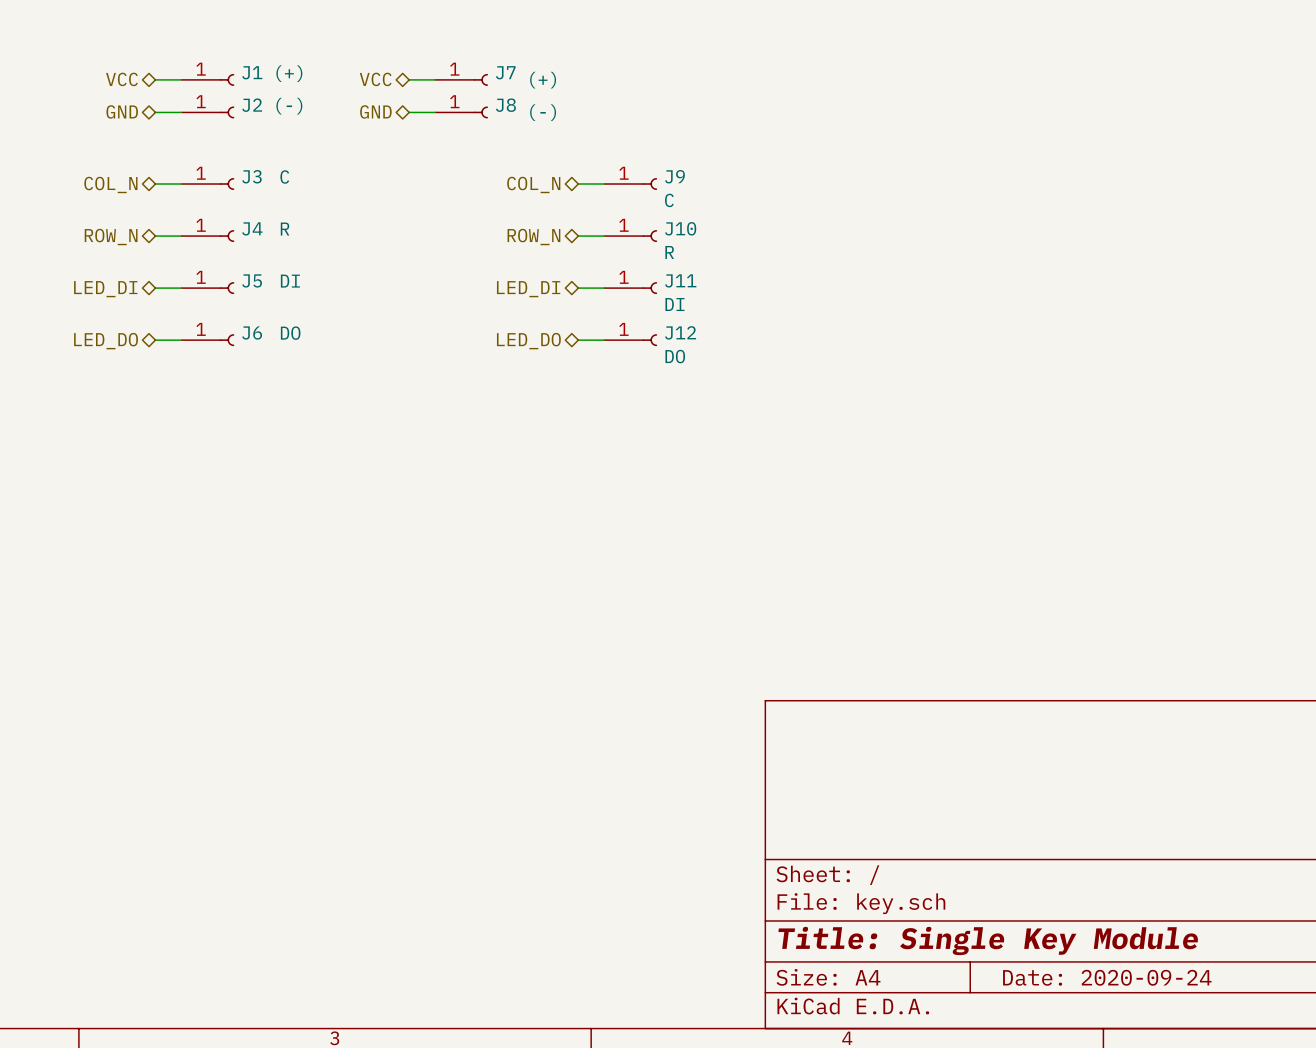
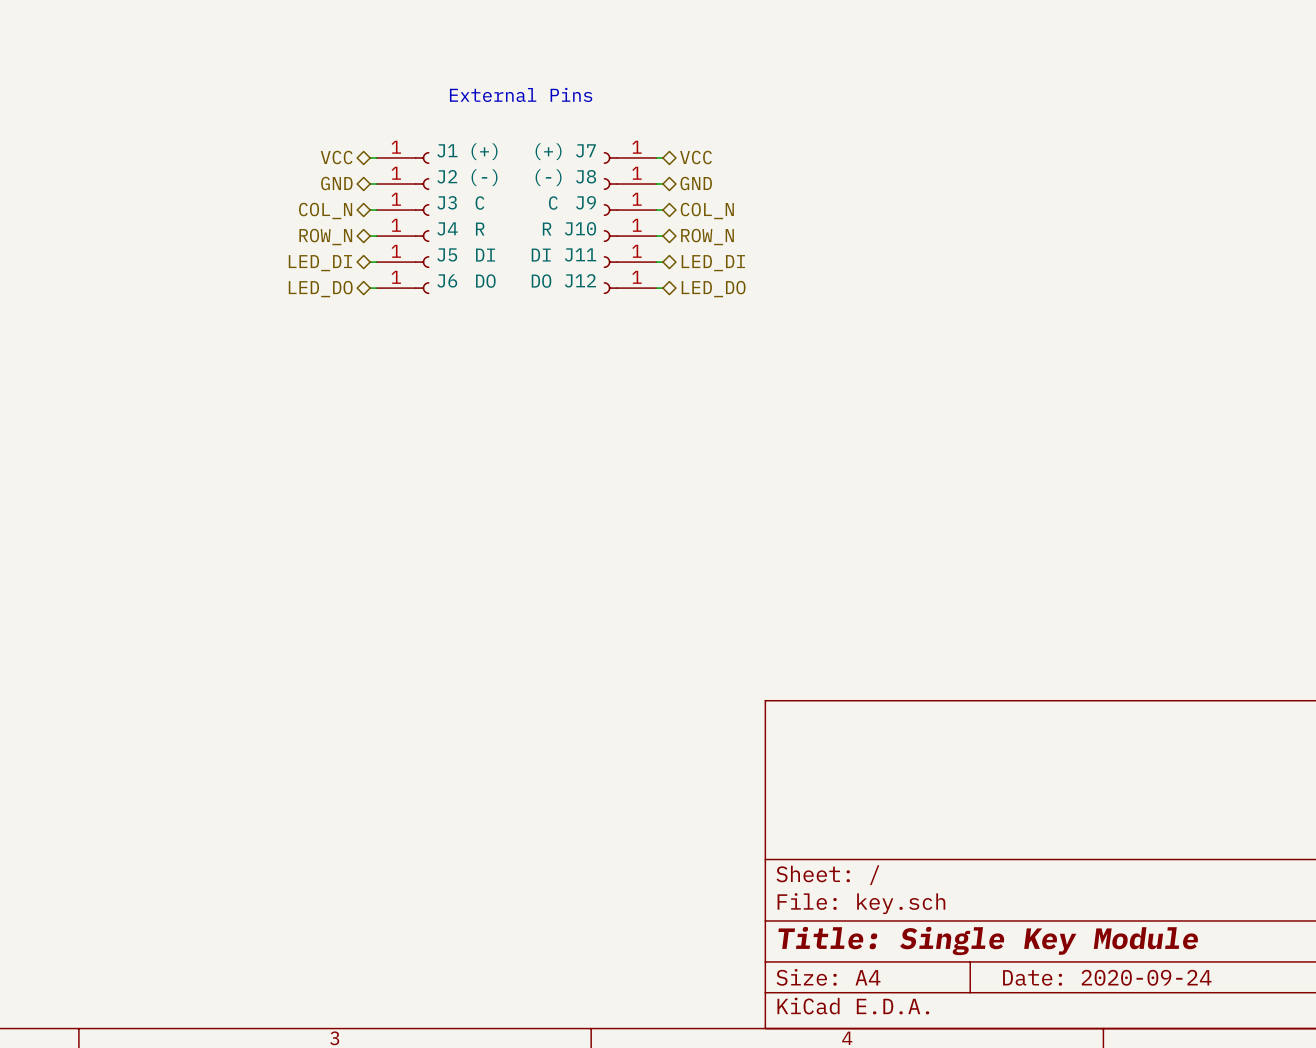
hierarchical label: VCC (121, 79) -> none
wire: (155, 79) (181, 79) -> none
J1 position: (207, 79) -> (403, 157)
hierarchical label position: VCC (375, 79) -> VCC (336, 157)
wire: (409, 79) (435, 79) -> none
J7 position: (461, 79) -> (630, 157)
J7 rotation: 0° (480, 79) -> 180° (610, 157)
text: none -> External Pins (521, 94)
hierarchical label: GND (122, 111) -> none
hierarchical label position: GND (375, 111) -> GND (336, 183)
wire: (155, 112) (181, 112) -> none
J2 position: (207, 112) -> (403, 184)
wire: (409, 112) (435, 112) -> none
J8 position: (461, 112) -> (630, 184)
J8 rotation: 0° (480, 112) -> 180° (610, 184)
wire: none -> (370, 157) (376, 157)
wire: none -> (656, 157) (662, 157)
hierarchical label: none -> VCC (695, 157)
hierarchical label: none -> GND (696, 183)
hierarchical label: COL_N (110, 184) -> none
wire: (155, 184) (181, 184) -> none
J3 position: (207, 184) -> (403, 210)
wire: none -> (370, 184) (376, 184)
hierarchical label: COL_N (533, 184) -> none
wire: (578, 184) (604, 184) -> none
J9 rotation: 0° (649, 184) -> 180° (610, 210)
wire: none -> (656, 184) (662, 184)
J9 value position: C (669, 200) -> C (553, 203)
wire: none -> (370, 210) (376, 210)
wire: none -> (656, 210) (662, 210)
hierarchical label: none -> COL_N (325, 211)
hierarchical label: none -> COL_N (707, 211)
wire: (155, 236) (181, 236) -> none
J4 position: (207, 236) -> (403, 236)
wire: none -> (370, 236) (376, 236)
wire: (578, 236) (604, 236) -> none
J10 rotation: 0° (649, 236) -> 180° (610, 236)
wire: none -> (656, 236) (662, 236)
hierarchical label: ROW_N (111, 237) -> none
hierarchical label: none -> ROW_N (325, 237)
hierarchical label: ROW_N (533, 237) -> none
hierarchical label: none -> ROW_N (707, 237)
J10 value position: R (669, 252) -> R (547, 229)
wire: none -> (370, 262) (376, 262)
wire: none -> (656, 262) (662, 262)
hierarchical label: none -> LED_DI (320, 263)
hierarchical label: none -> LED_DI (713, 263)
wire: (155, 288) (181, 288) -> none
J5 position: (207, 288) -> (403, 262)
wire: none -> (370, 288) (376, 288)
wire: (578, 288) (604, 288) -> none
J11 rotation: 0° (649, 288) -> 180° (610, 262)
wire: none -> (656, 288) (662, 288)
hierarchical label: LED_DI (105, 289) -> none
hierarchical label: none -> LED_DO (320, 289)
hierarchical label: LED_DI (528, 289) -> none
hierarchical label: none -> LED_DO (713, 289)
J11 value position: DI (674, 304) -> DI (541, 255)
wire: (155, 340) (181, 340) -> none
J6 position: (207, 340) -> (403, 288)
wire: (578, 340) (604, 340) -> none
J12 position: (630, 340) -> (630, 288)
J12 rotation: 0° (649, 340) -> 180° (610, 288)
hierarchical label: LED_DO (106, 341) -> none
hierarchical label: LED_DO (528, 341) -> none
J12 value position: DO (675, 356) -> DO (541, 281)

